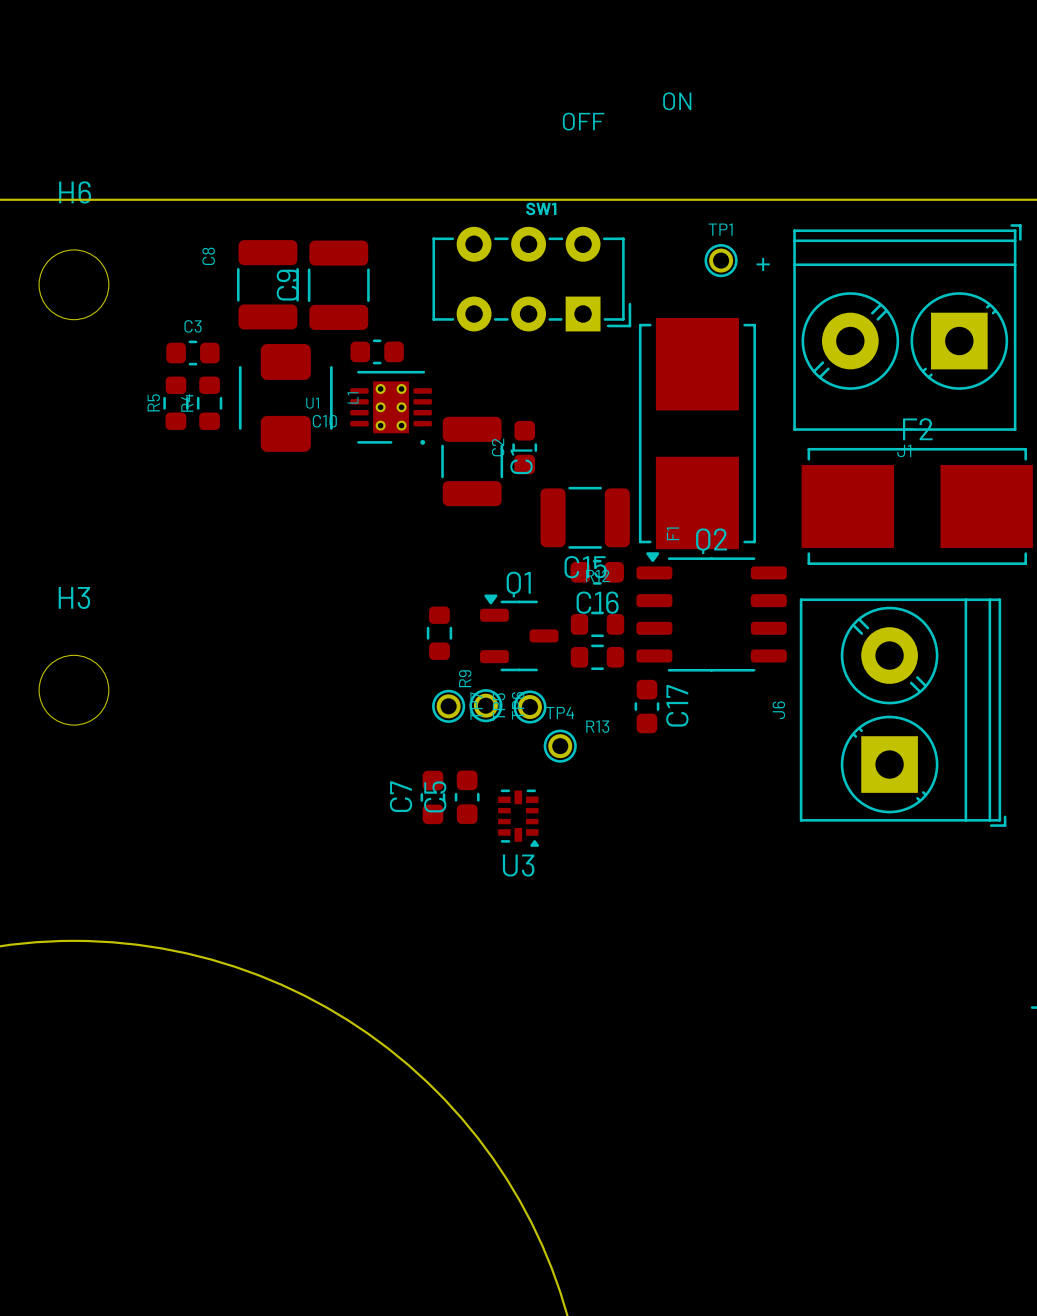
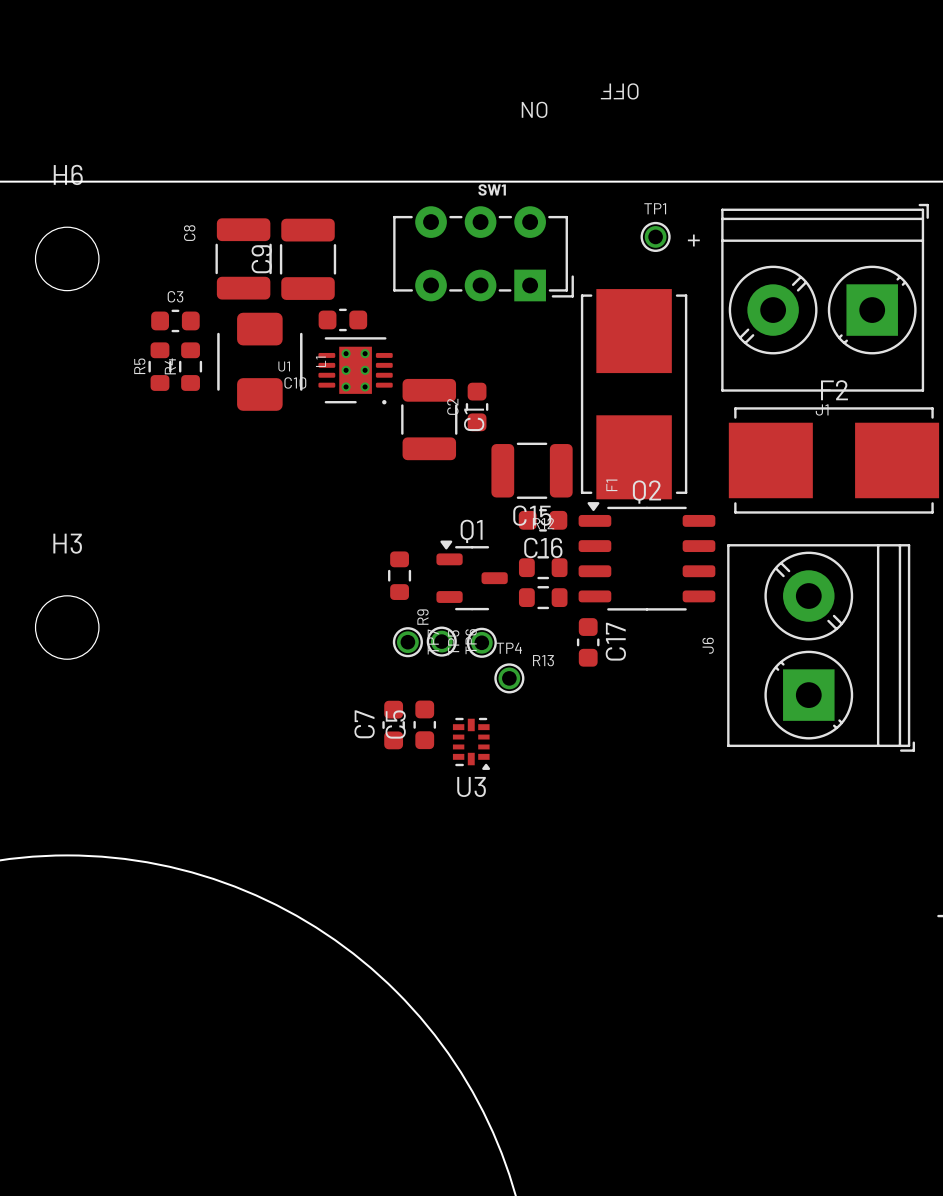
text rotation: 0° (677, 101) -> 180° (534, 109)
text position: ON (677, 101) -> ON (534, 109)
text rotation: 0° (583, 121) -> 180° (619, 91)
text position: OFF (583, 121) -> OFF (619, 91)

